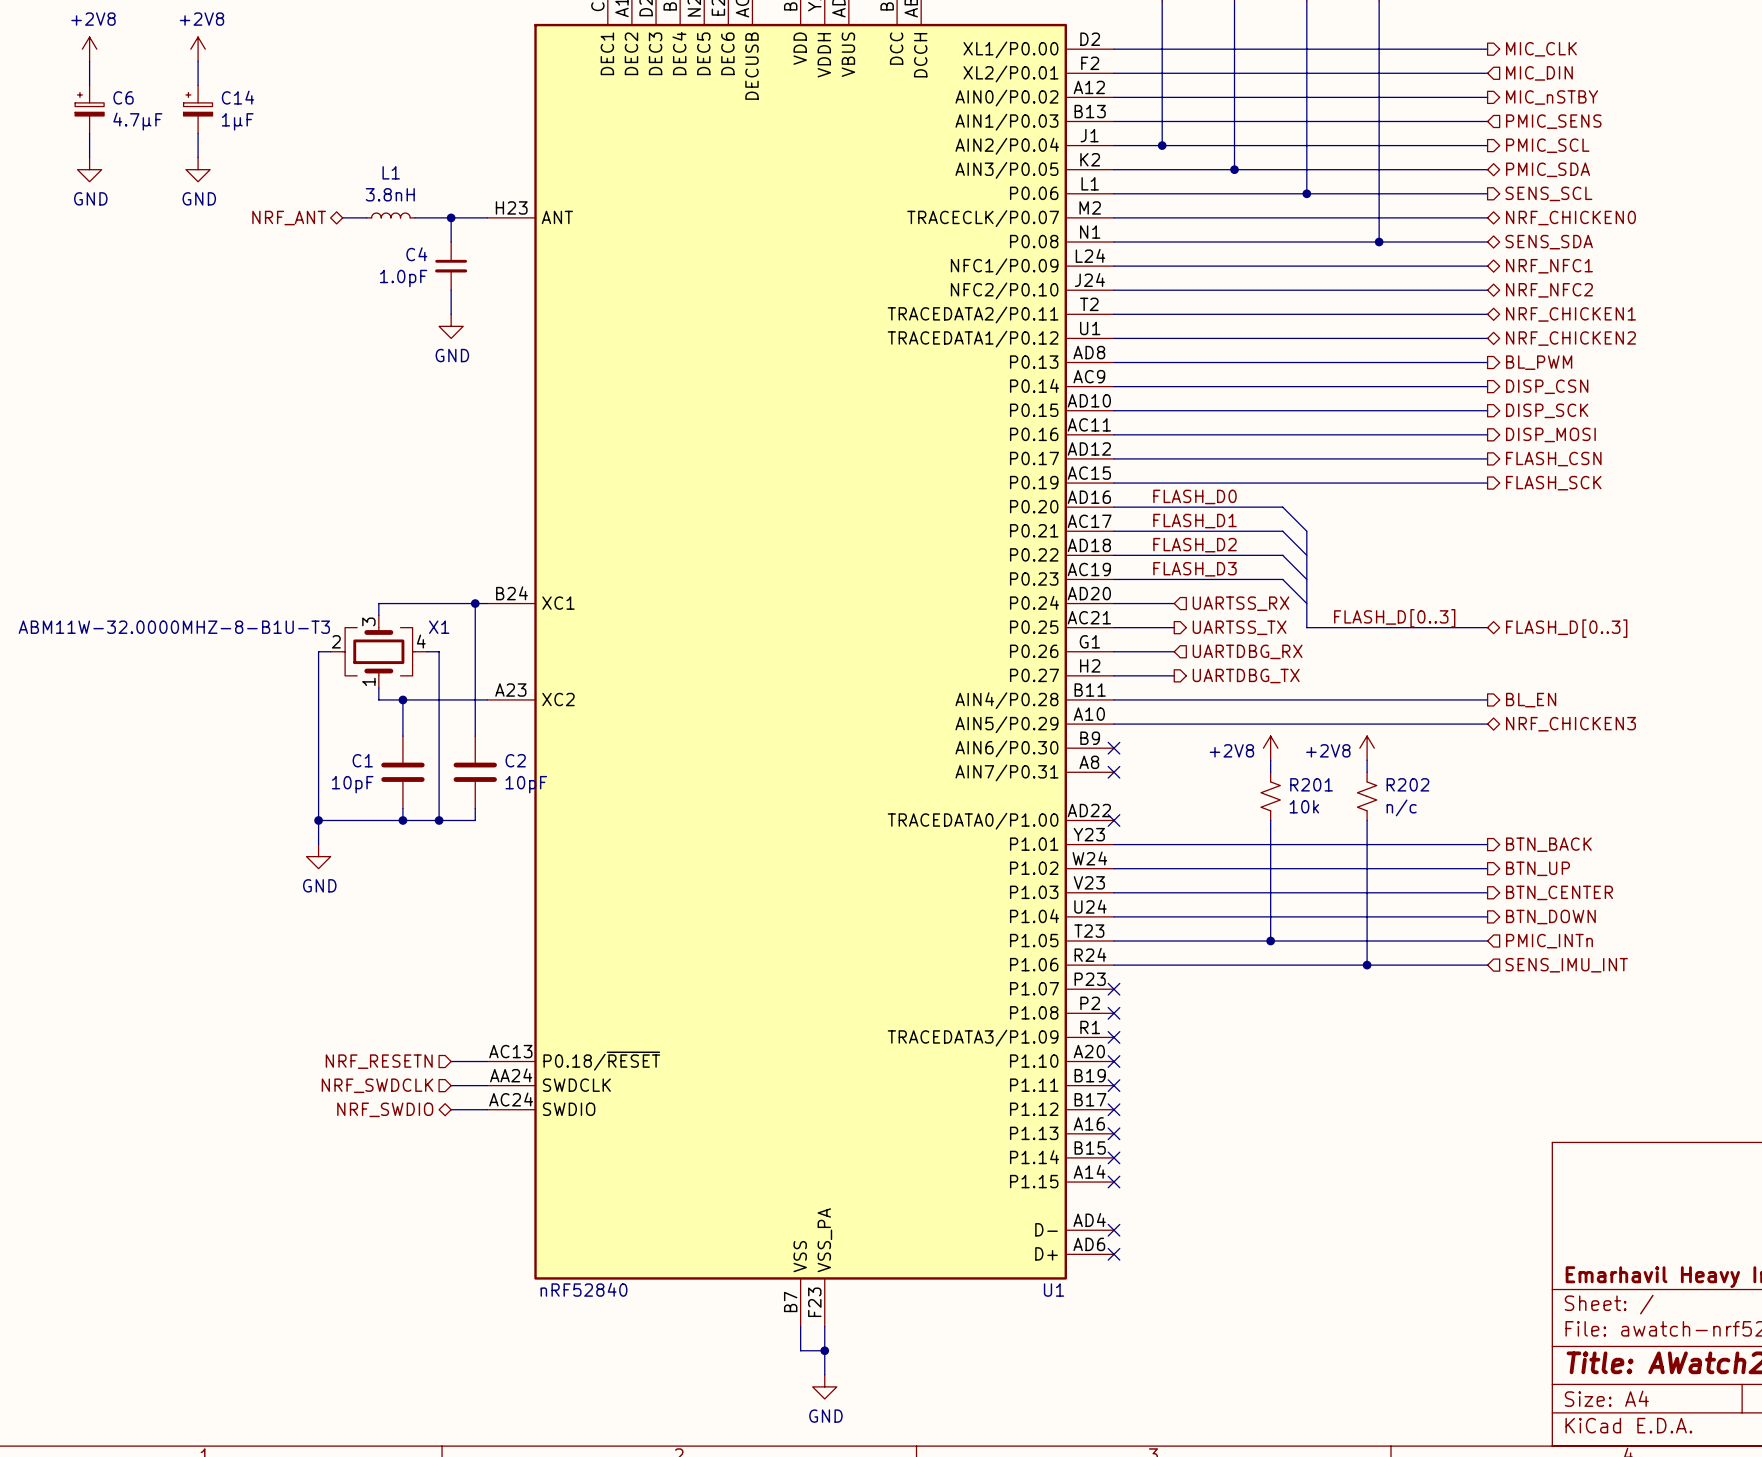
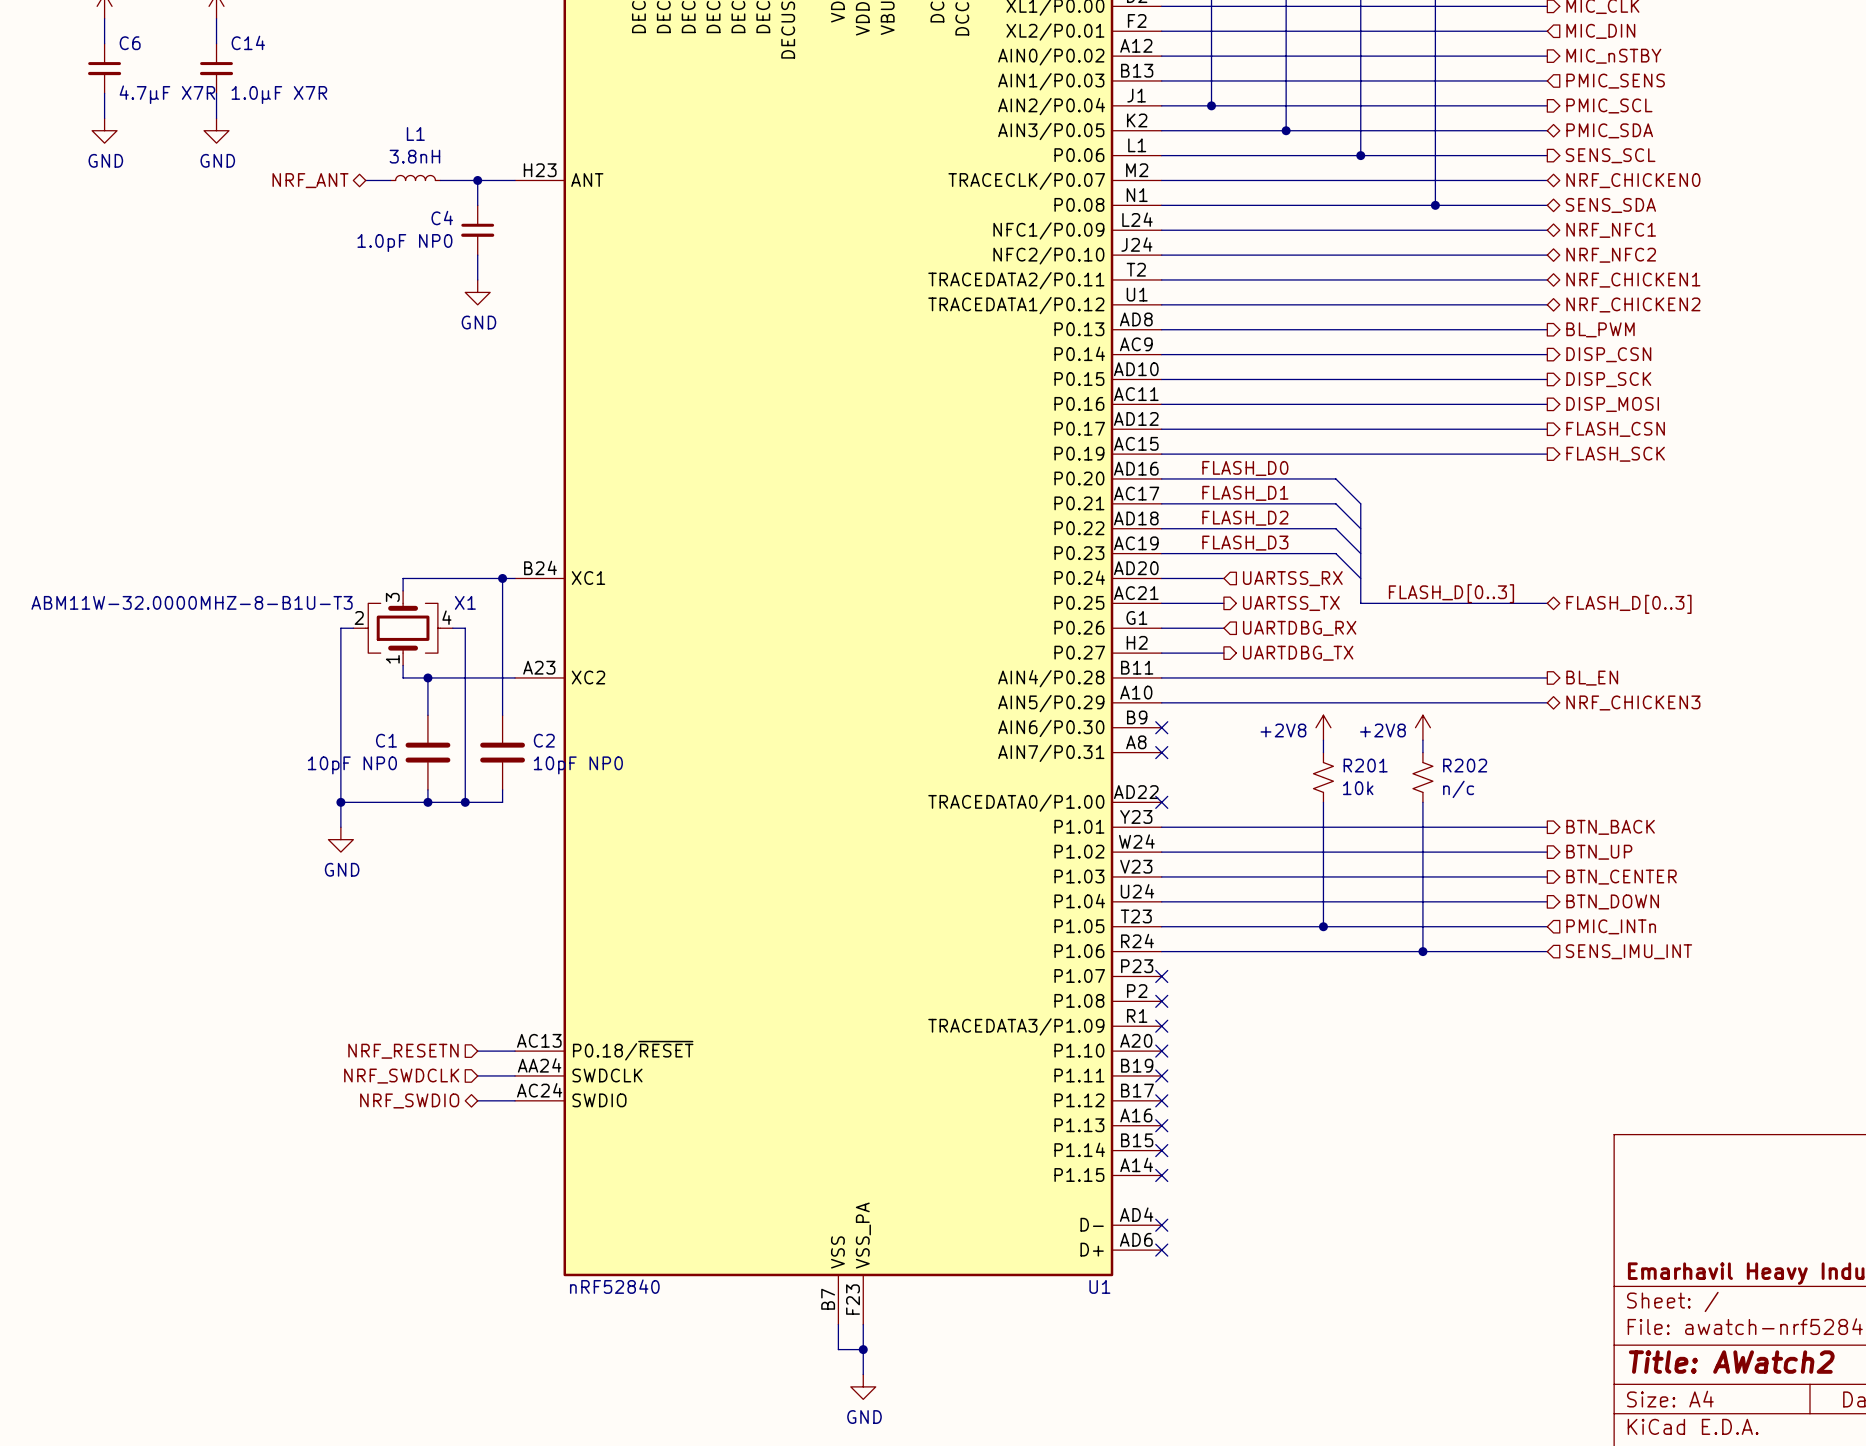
C6 symbol: [75, 85, 105, 134] -> [88, 43, 122, 94]
C14 symbol: [183, 85, 213, 134] -> [199, 43, 234, 94]
C6 value: 4.7µF (137, 121) -> 4.7µF X7R (167, 94)
C14 value: 1µF (237, 121) -> 1.0µF X7R (279, 95)
C4 value: 1.0pF (403, 278) -> 1.0pF NP0 (404, 243)
C1 value: 10pF (352, 784) -> 10pF NP0 (352, 765)
C2 value: 10pF (526, 784) -> 10pF NP0 (578, 765)

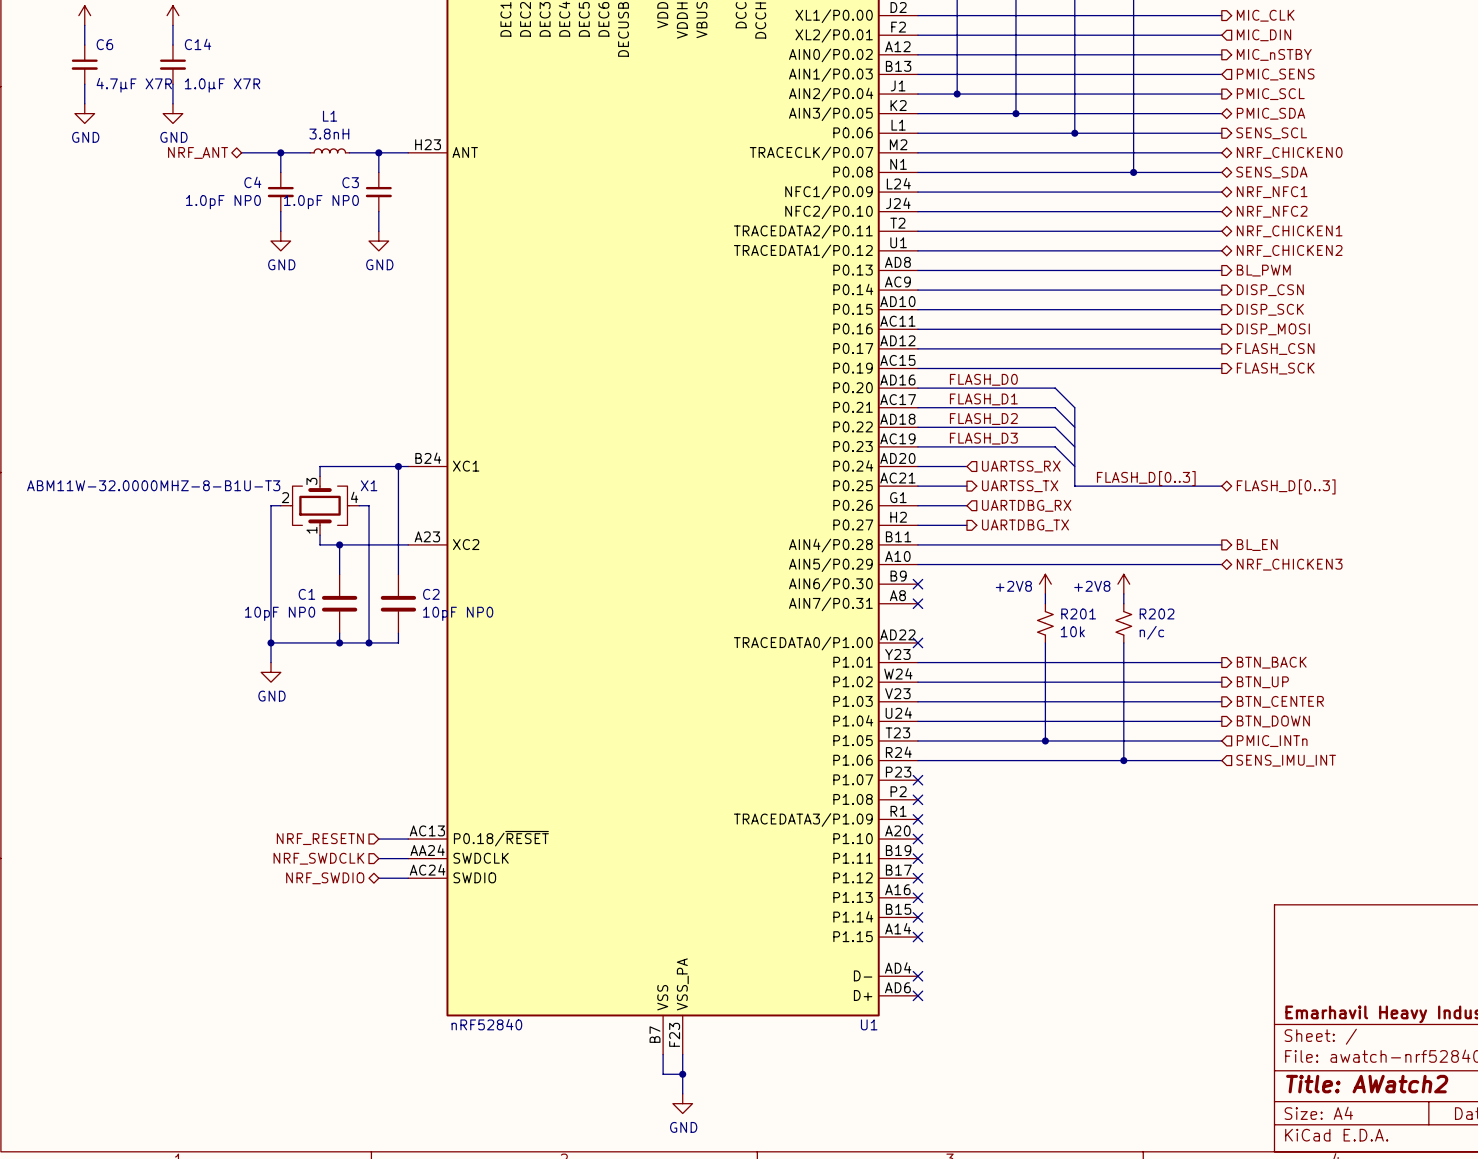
wire: none -> (241, 152) (290, 152)
hierarchical label position: NRF_ANT (310, 180) -> NRF_ANT (198, 152)
wire: none -> (280, 152) (280, 172)
junction: none -> (280, 152)
C4 name: C4 (442, 218) -> C3 (350, 182)
C4: none -> 1.0pF NP0 (280, 192)
wire: none -> (280, 211) (280, 231)
power symbol: none -> GND (280, 241)

